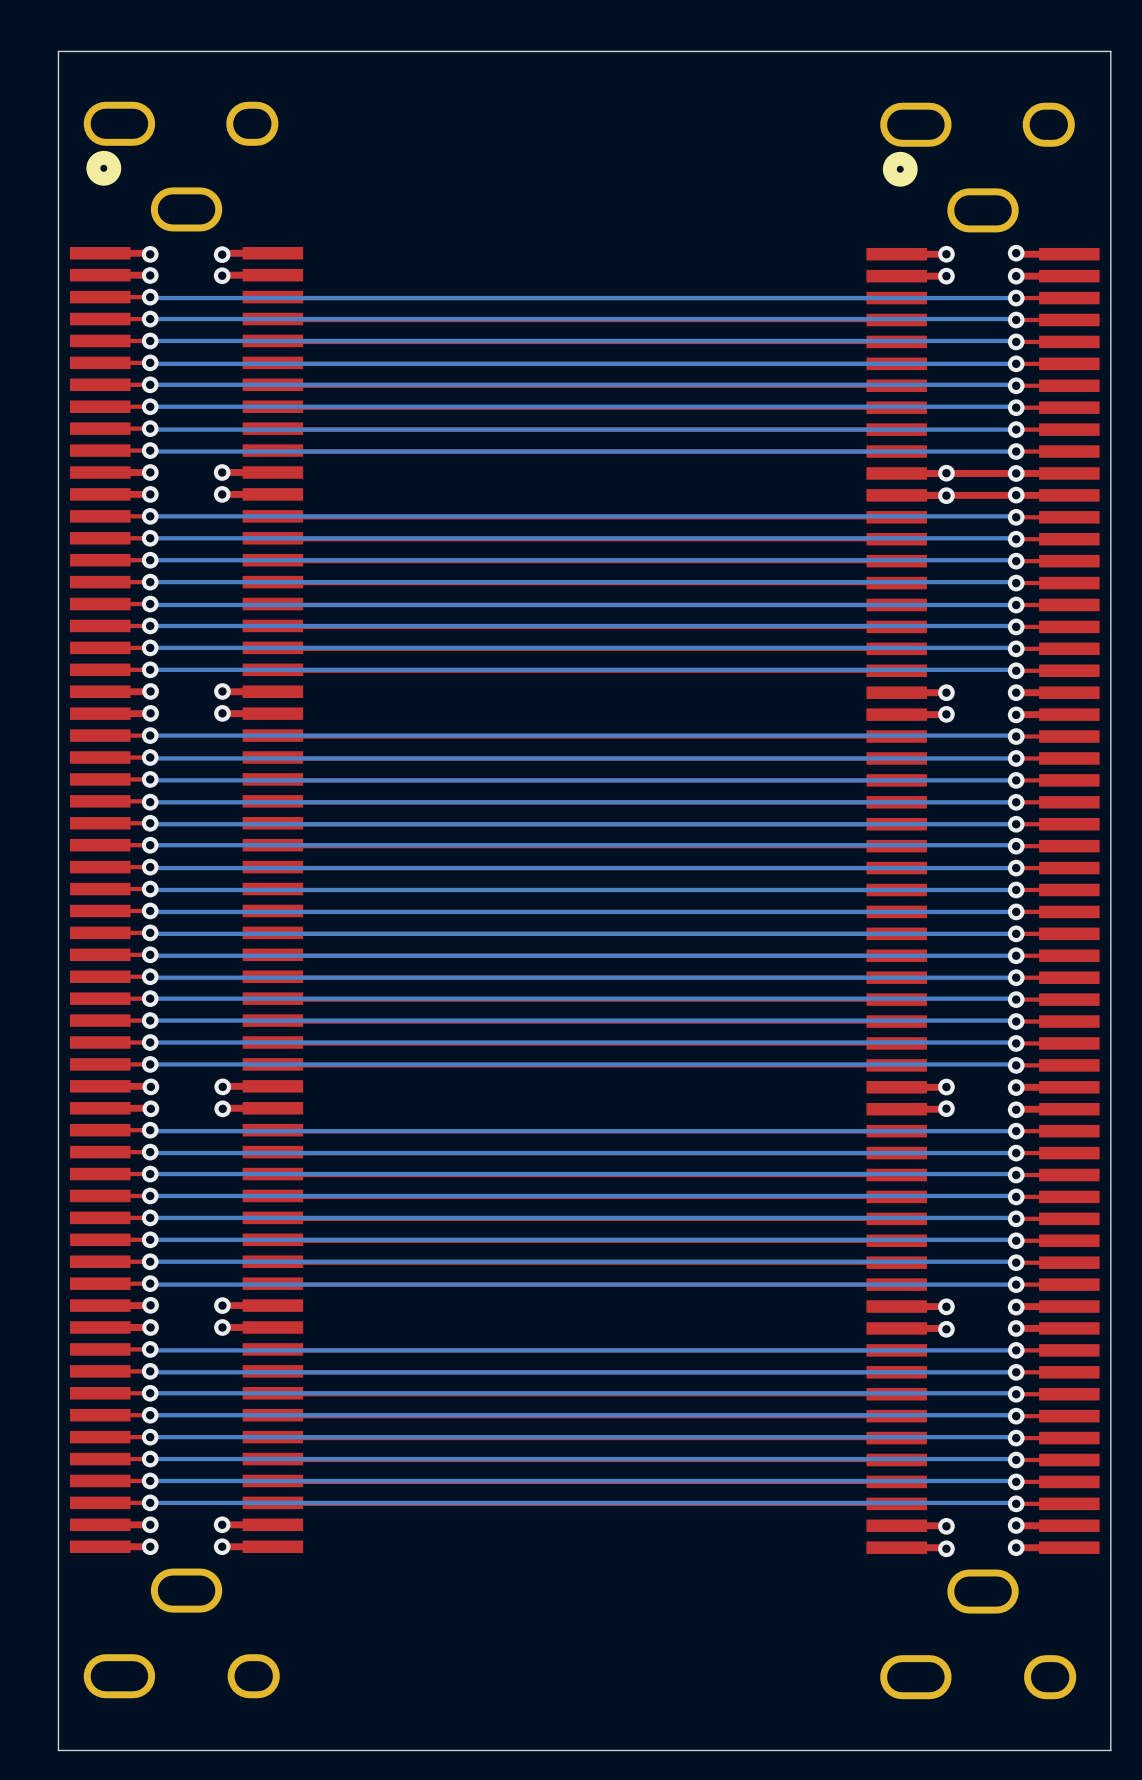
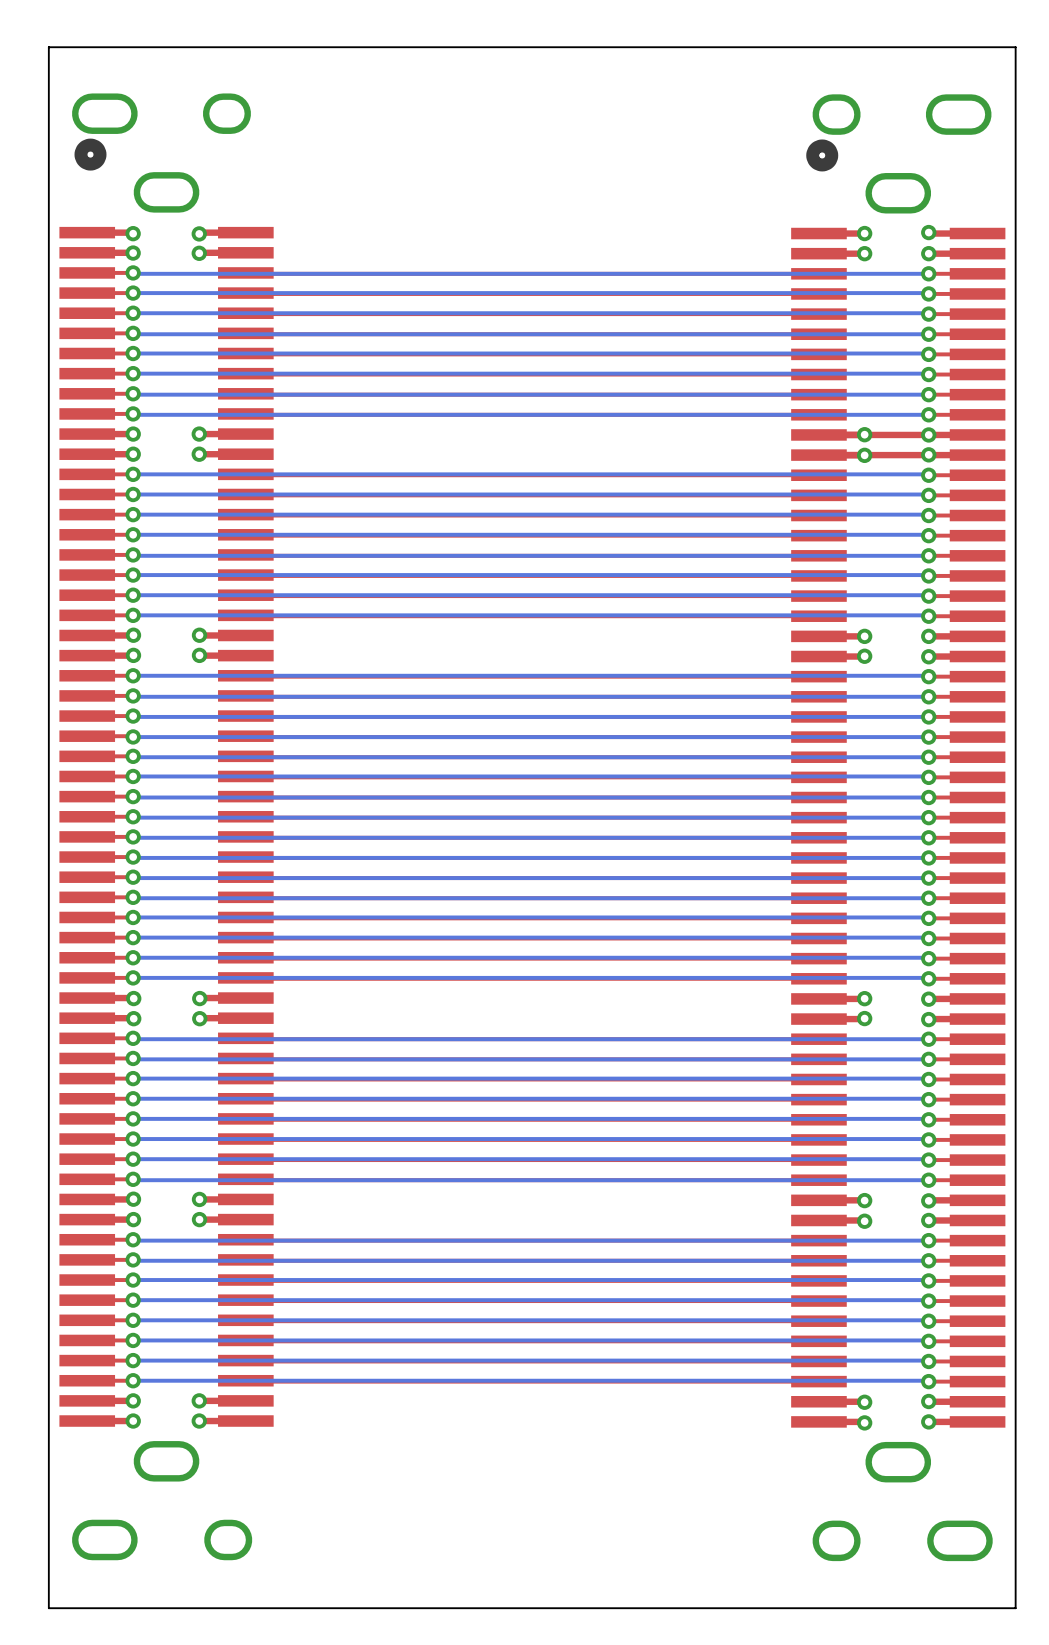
part footprint: [866, 102, 1100, 1700] -> [791, 94, 1006, 1562]

